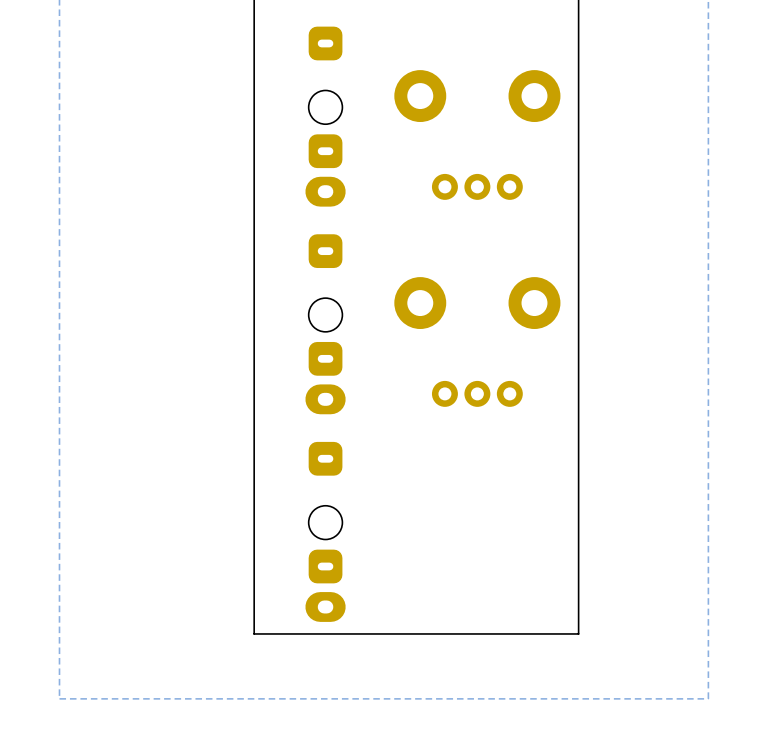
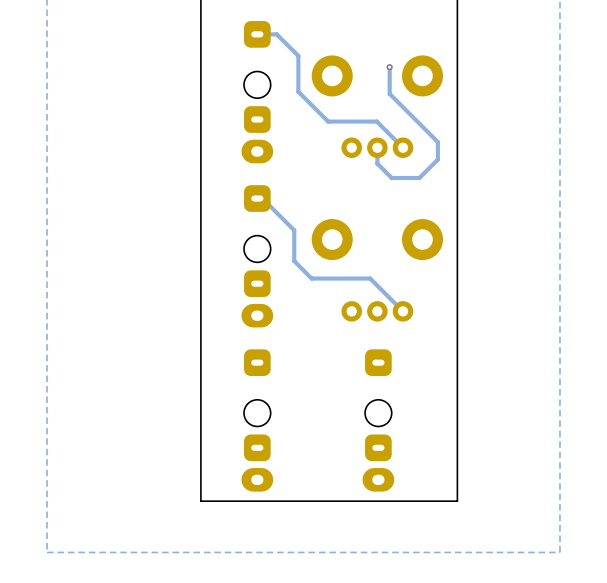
track: none -> (257, 34) (276, 34) (298, 55) (298, 91) (328, 121) (376, 121) (403, 147)
track: none -> (389, 67) (389, 93) (437, 142) (437, 159) (419, 178) (391, 178) (377, 163) (377, 147)
via: none -> (389, 67)
track: none -> (257, 198) (262, 198) (294, 230) (294, 261) (311, 278) (370, 278) (403, 311)
part: none -> (378, 420)

